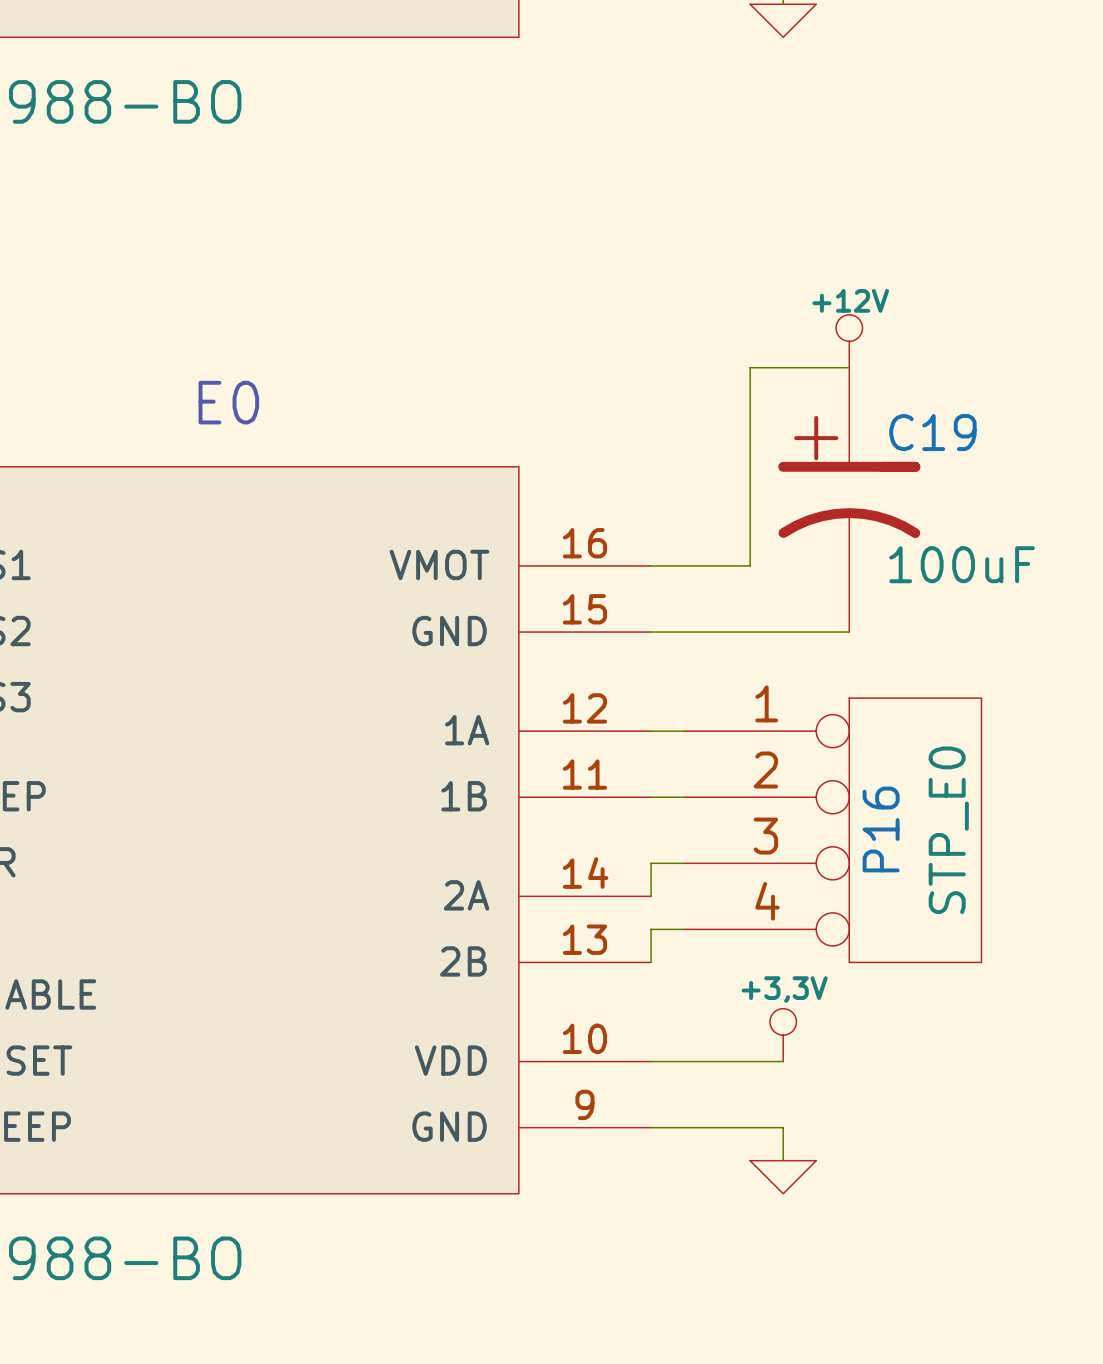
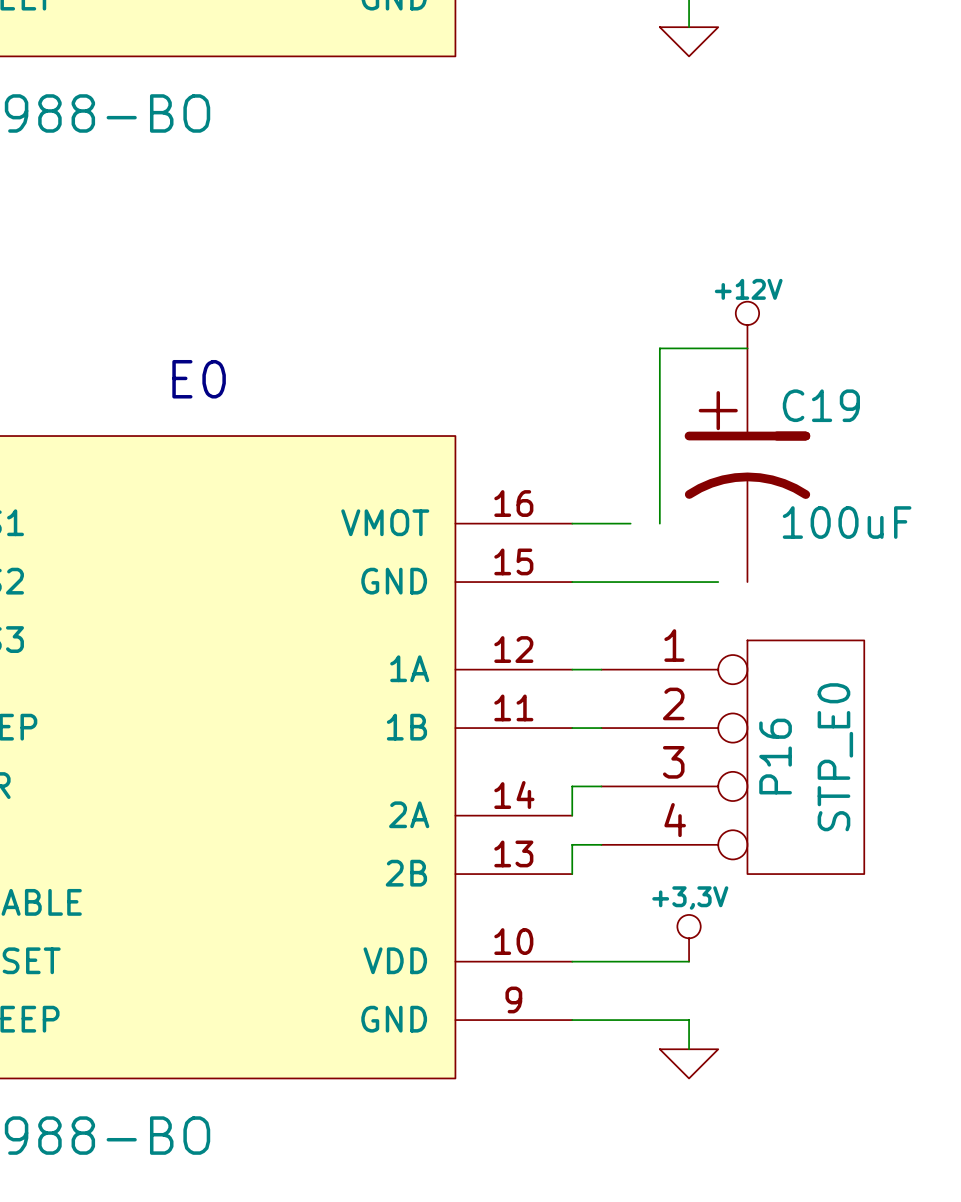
wire: (717, 565) (750, 565) -> none
wire: (816, 632) (849, 632) -> none

